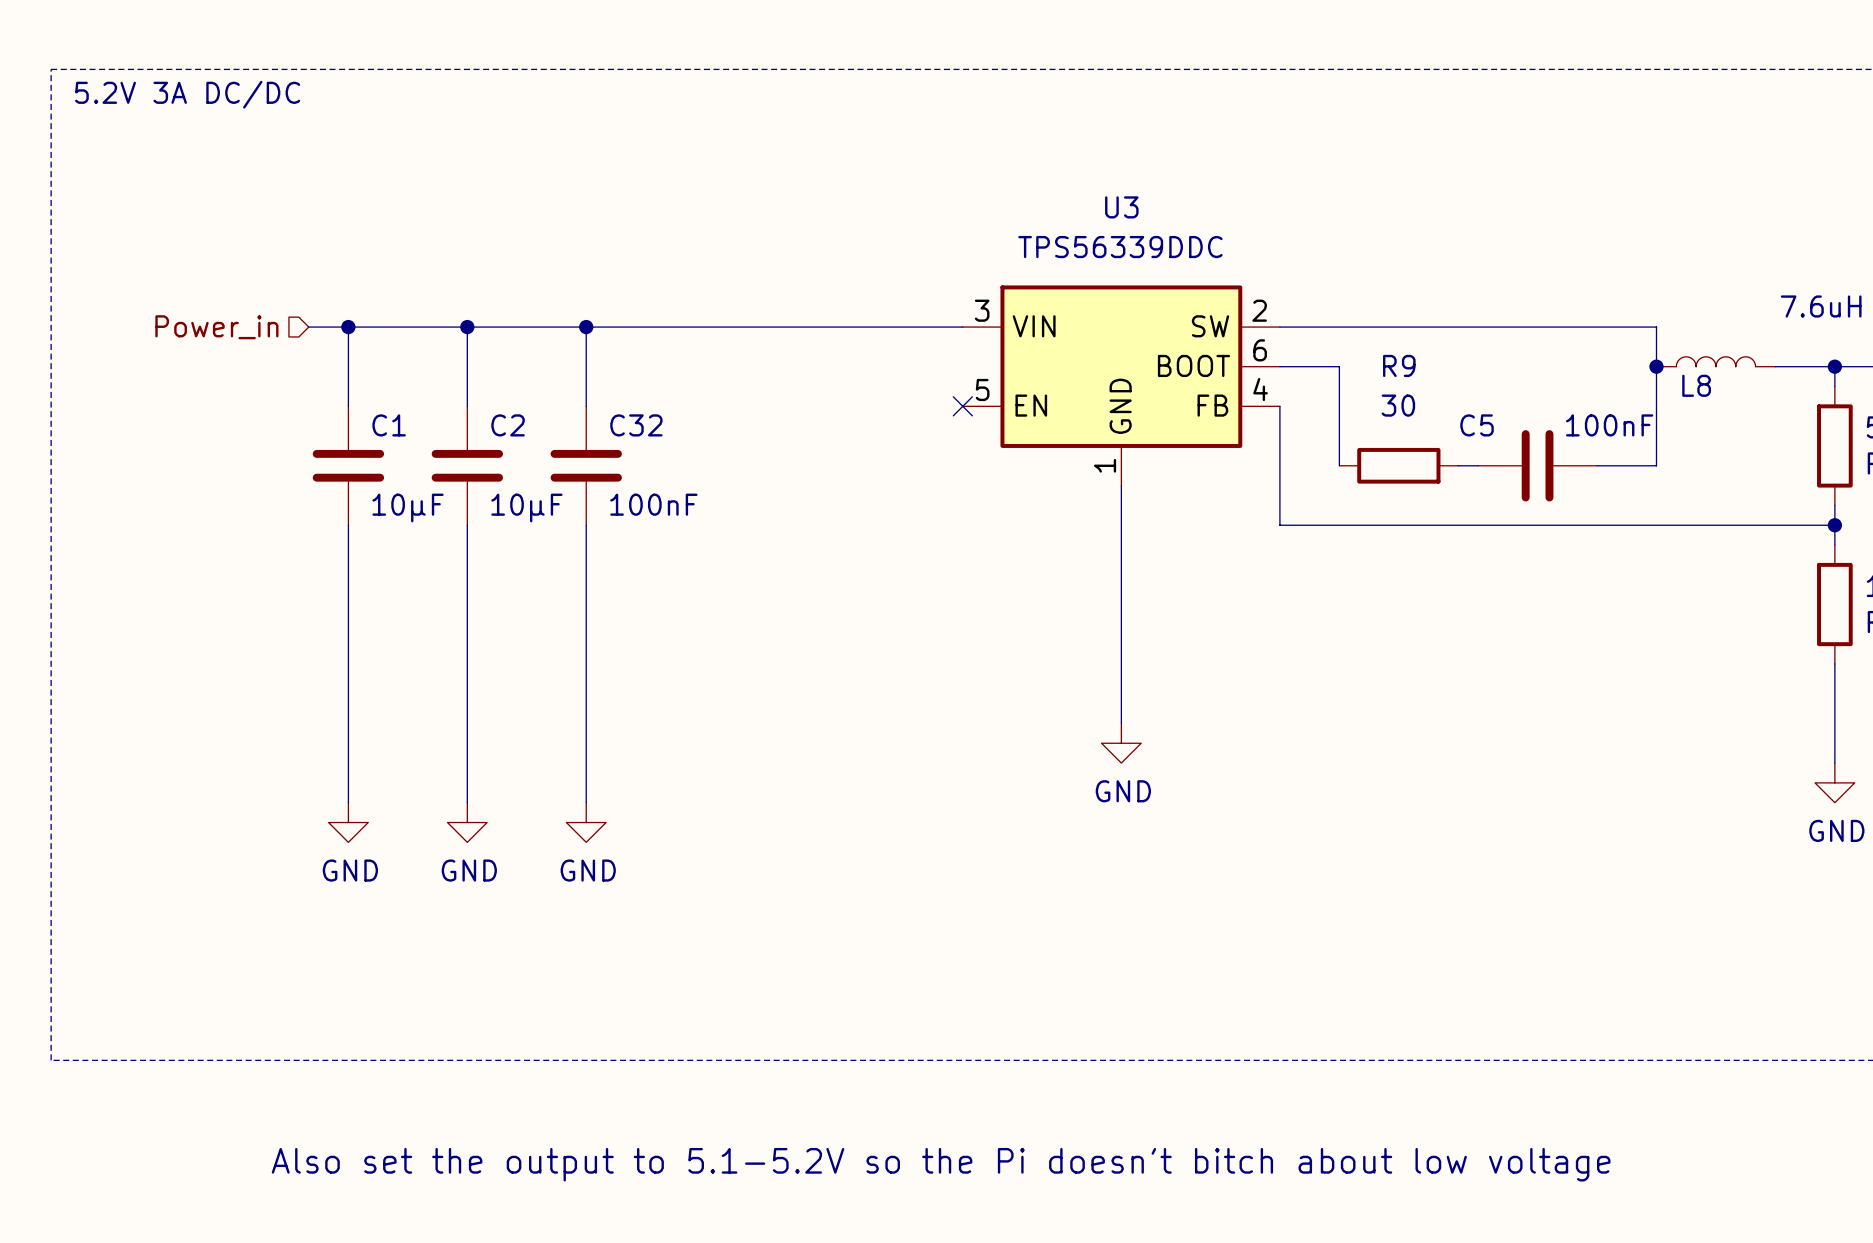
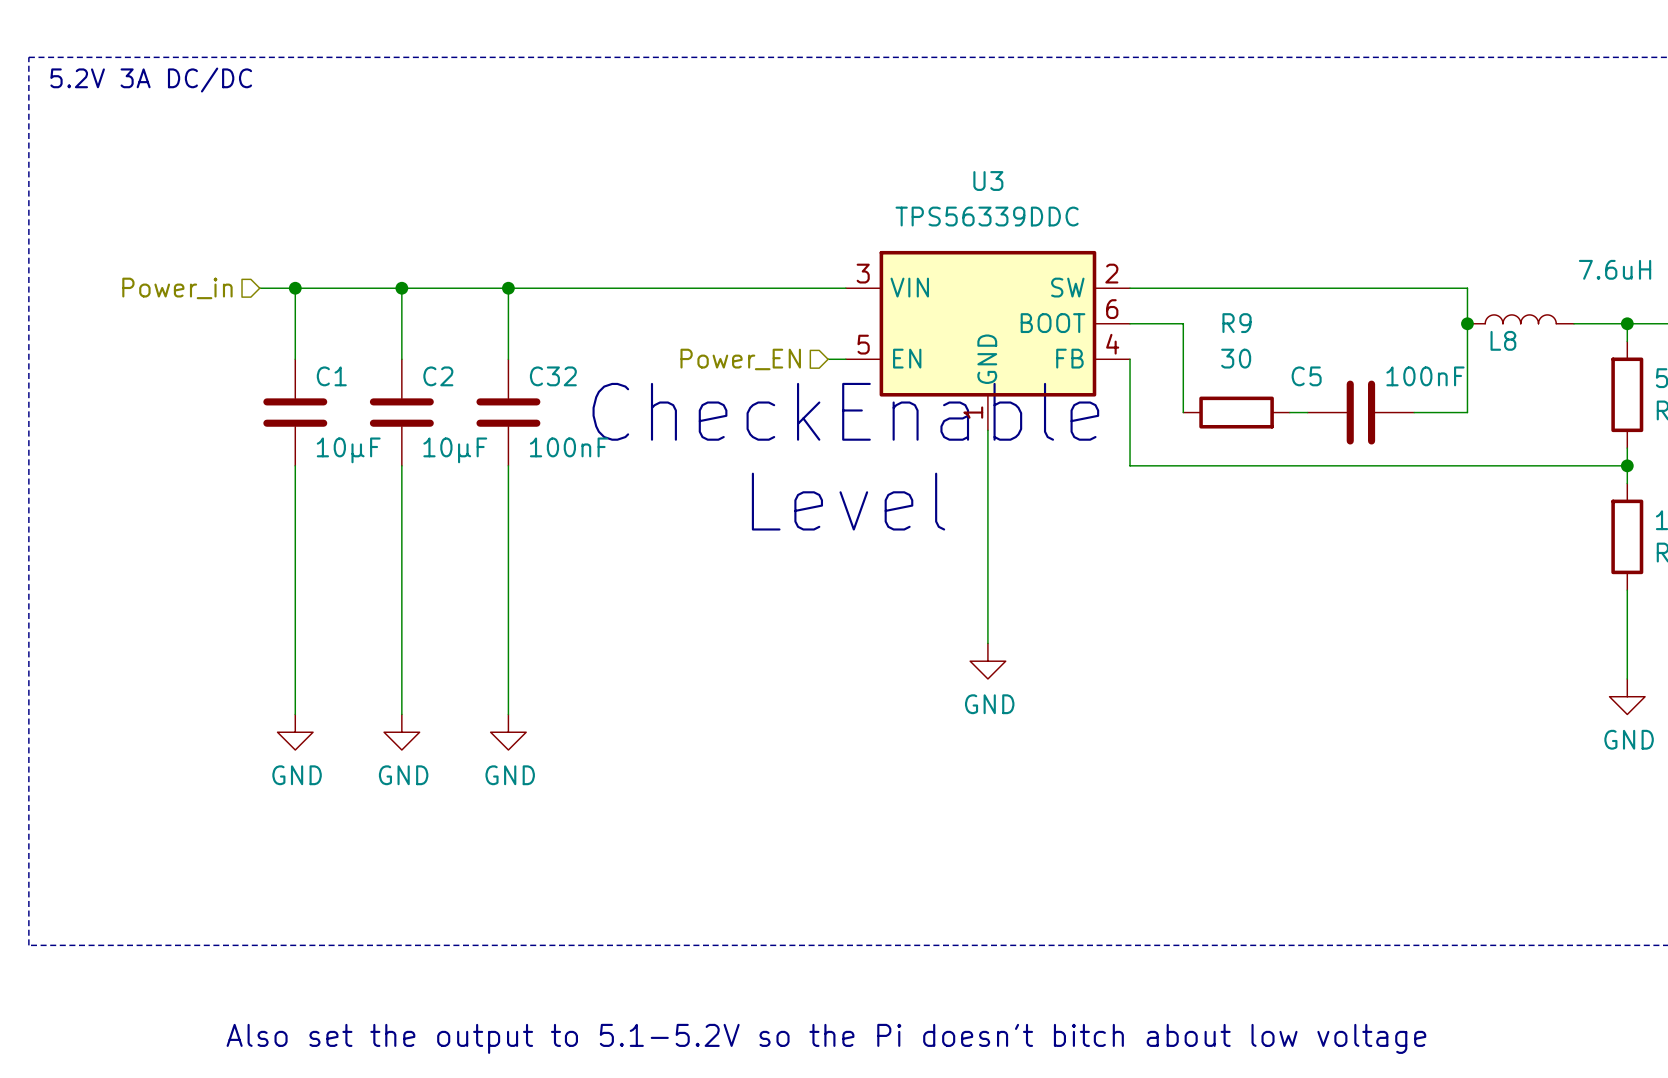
hierarchical label: none -> Power_EN (740, 359)
wire: none -> (828, 359) (845, 359)
no-connect mark: (962, 406) -> none
text: none -> CheckEnable (845, 411)
text: none -> Level (848, 501)

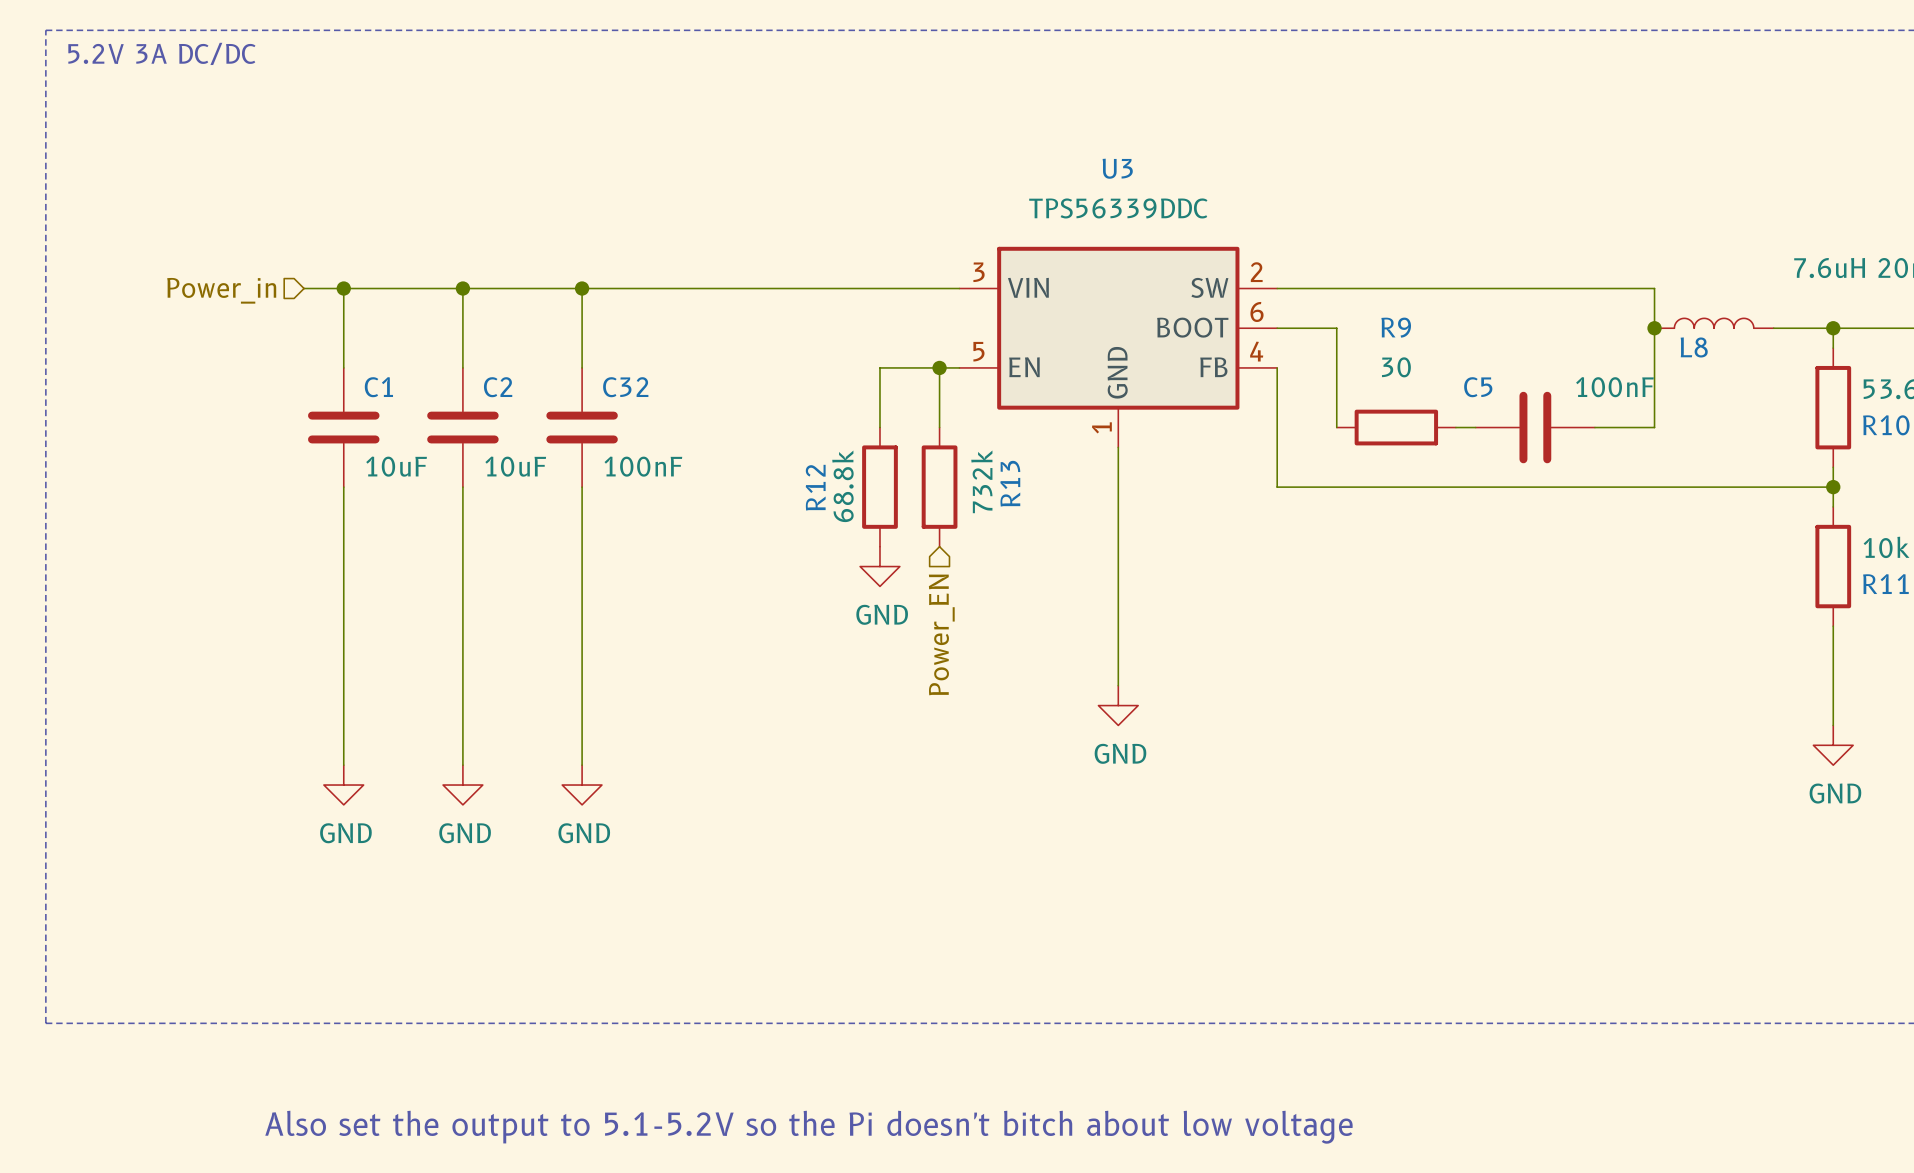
hierarchical label rotation: 0° (740, 359) -> 90° counterclockwise (941, 634)
hierarchical label position: Power_EN (740, 359) -> Power_EN (941, 634)
junction: none -> (939, 367)
text: CheckEnable (845, 411) -> none
wire: none -> (879, 427) (879, 367) (939, 367) (939, 427)
C1 value: 10µF (348, 450) -> 10uF (396, 466)
C2 value: 10µF (455, 450) -> 10uF (515, 466)
R12: none -> 68.8k (879, 487)
R13: none -> 732k (939, 487)
text: Level (848, 501) -> none
power symbol: none -> GND (879, 566)

